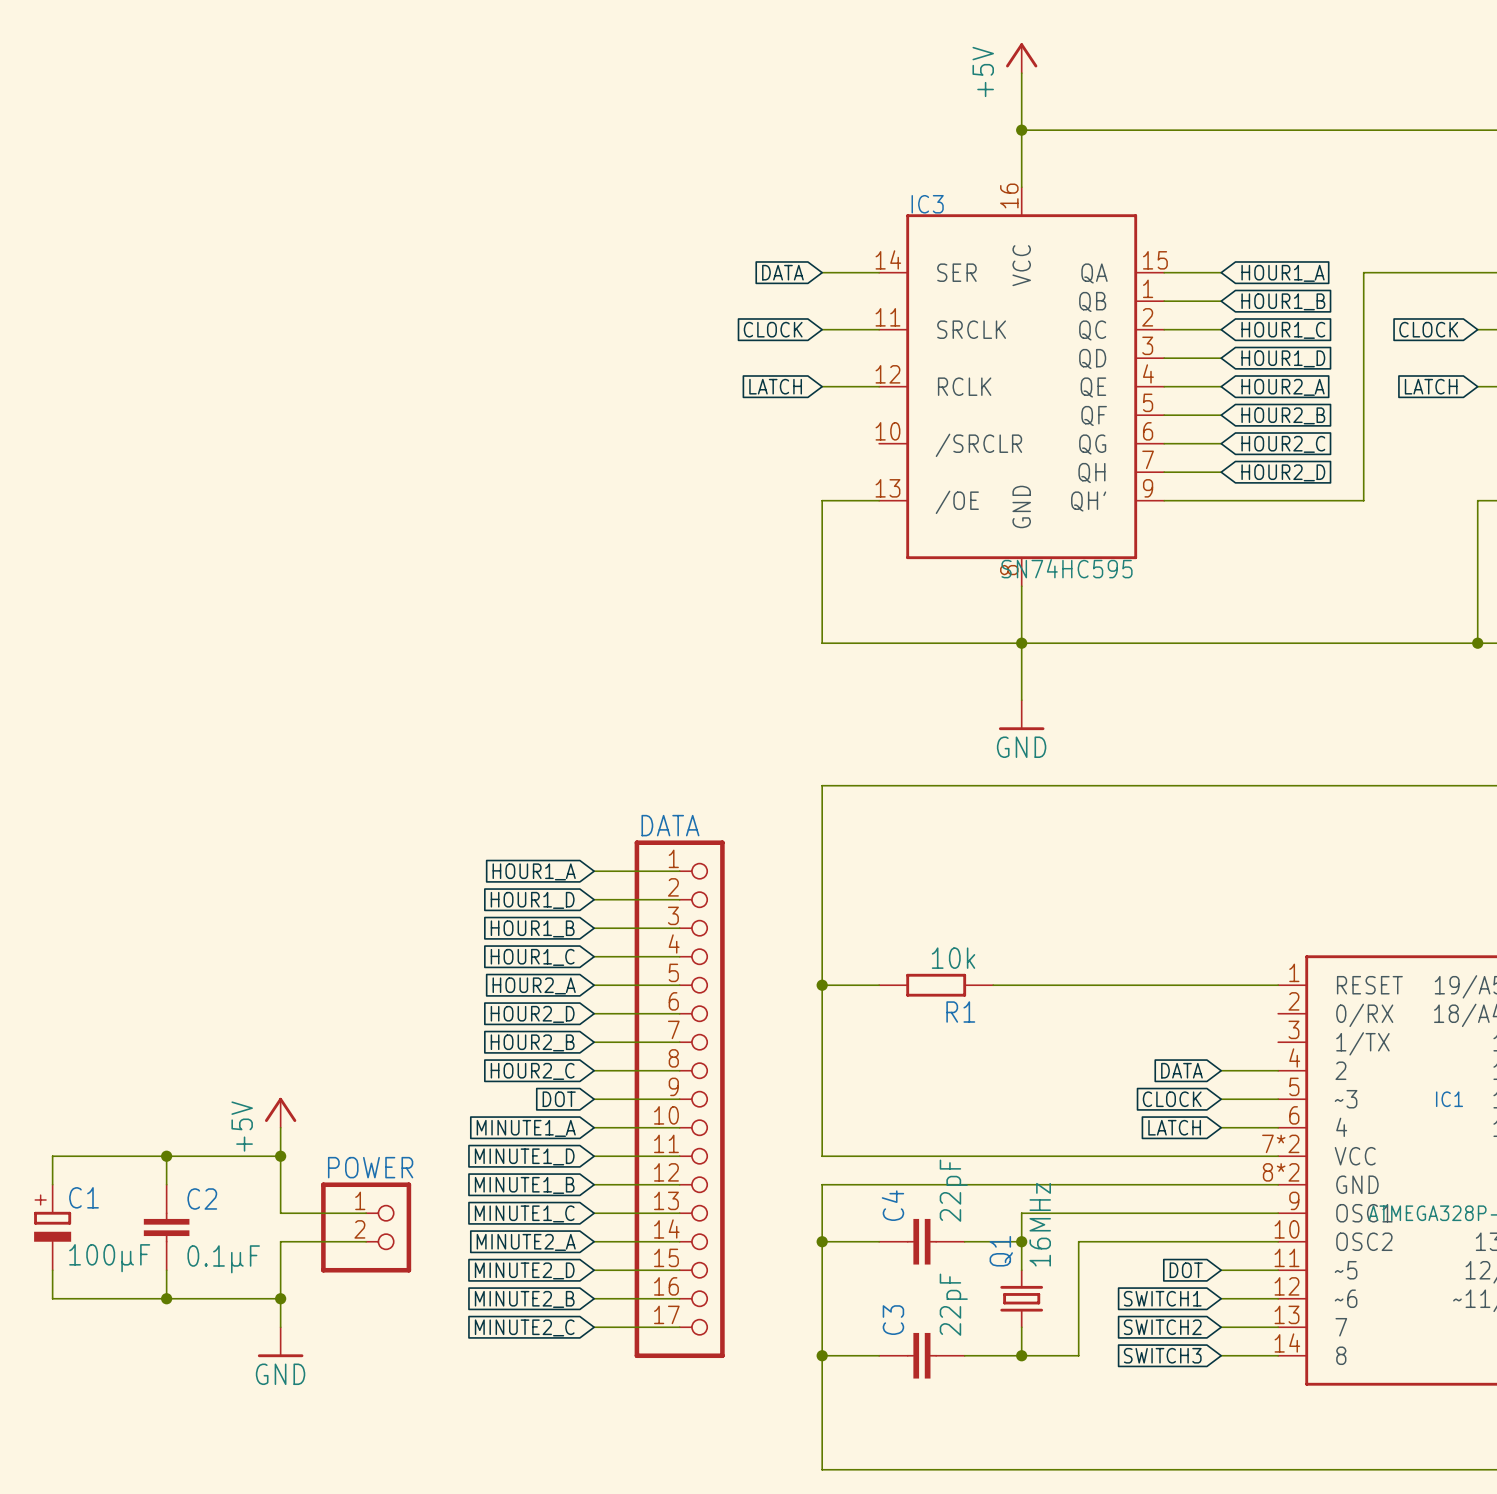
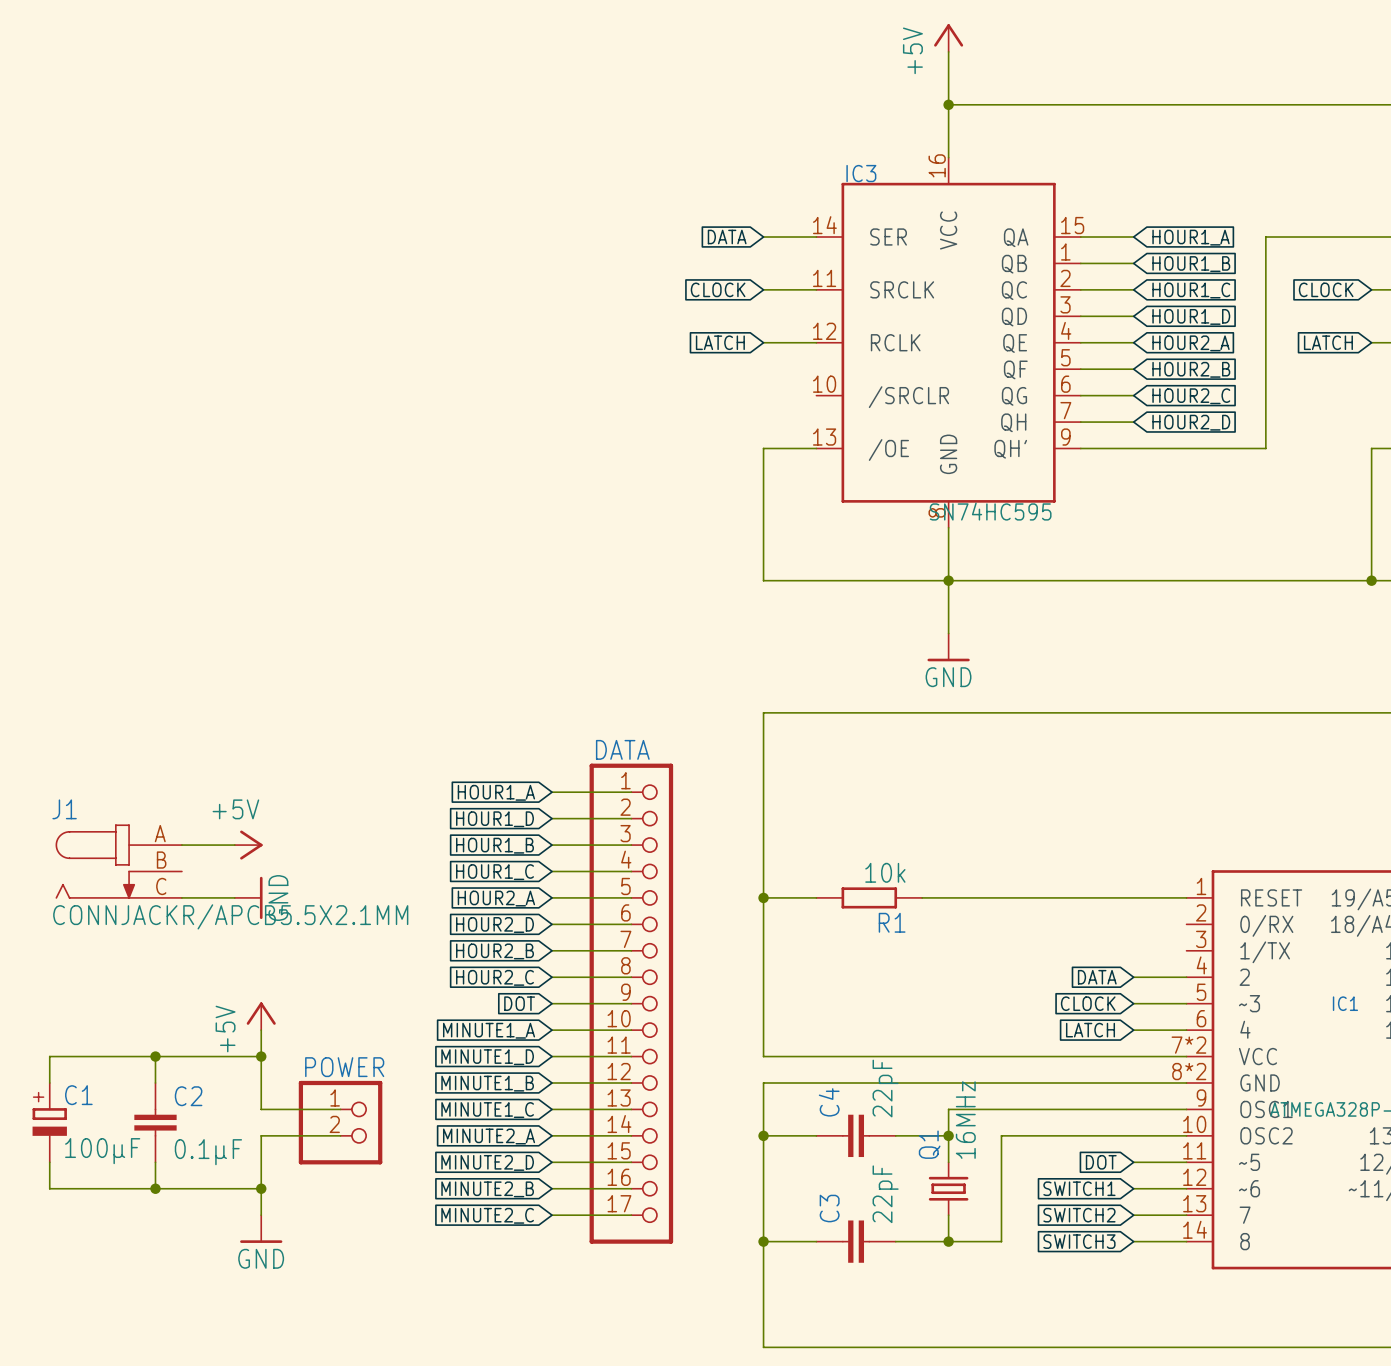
wire: none -> (181, 845) (234, 845)
power symbol: none -> +5V (248, 845)
J1: none -> CONNJACKR/APCB5.5X2.1MM (118, 861)
wire: none -> (181, 897) (234, 897)
power symbol: none -> GND (248, 897)

